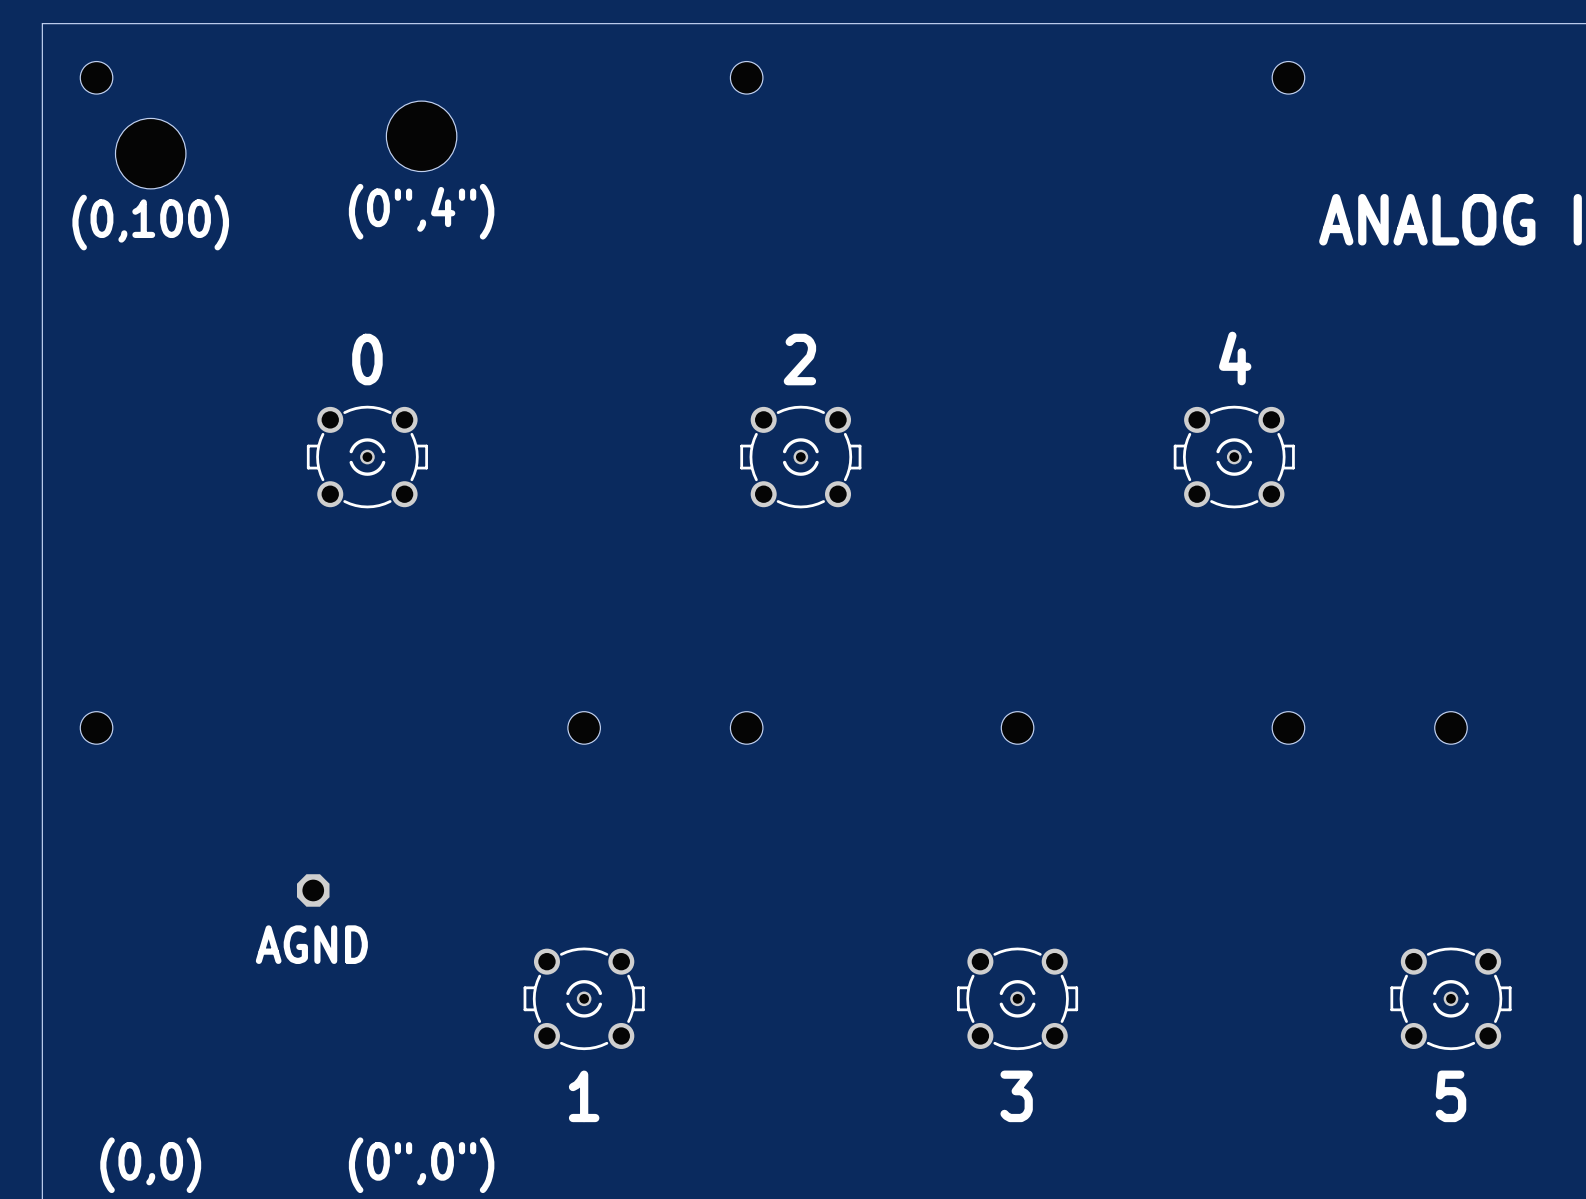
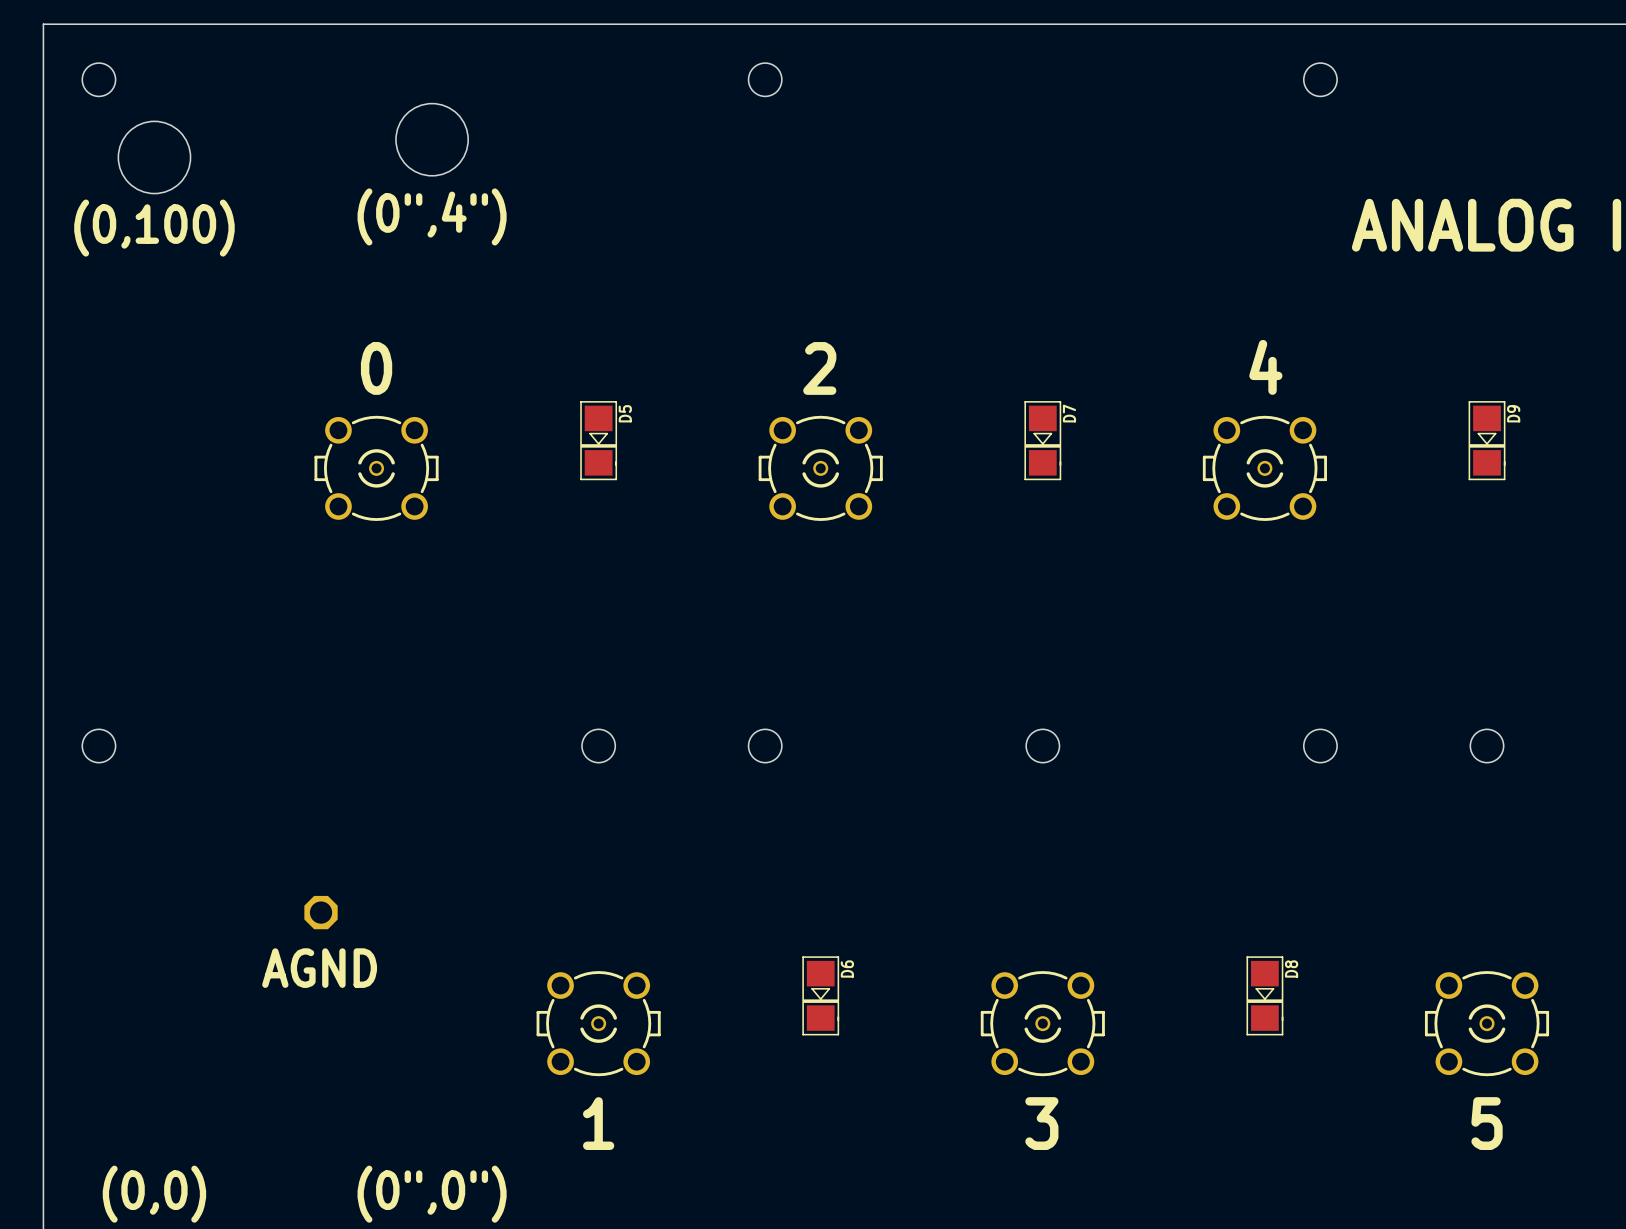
D5: none -> (598, 440)
D7: none -> (1042, 440)
D9: none -> (1487, 440)
D6: none -> (820, 995)
D8: none -> (1264, 995)

